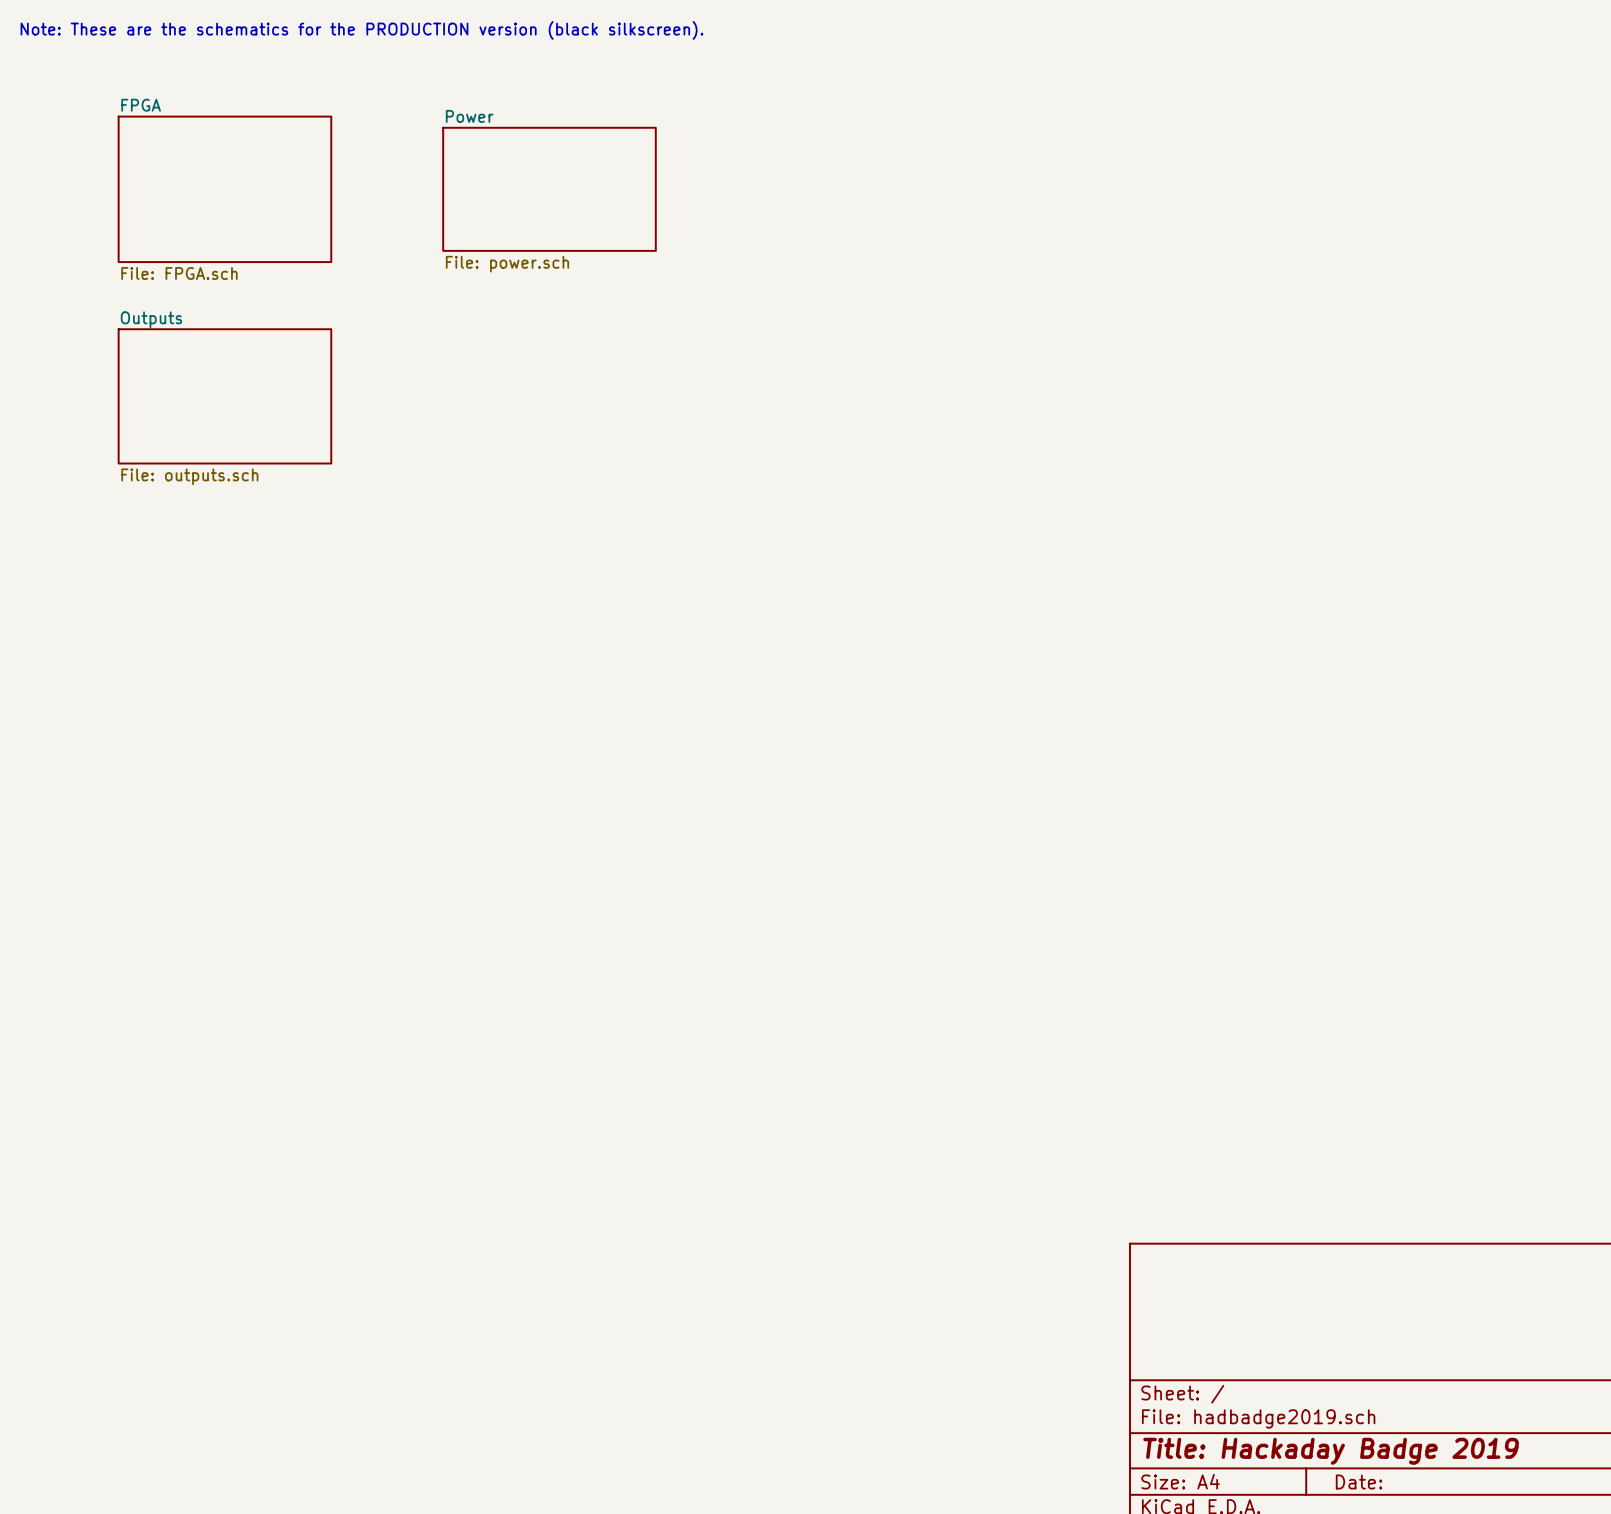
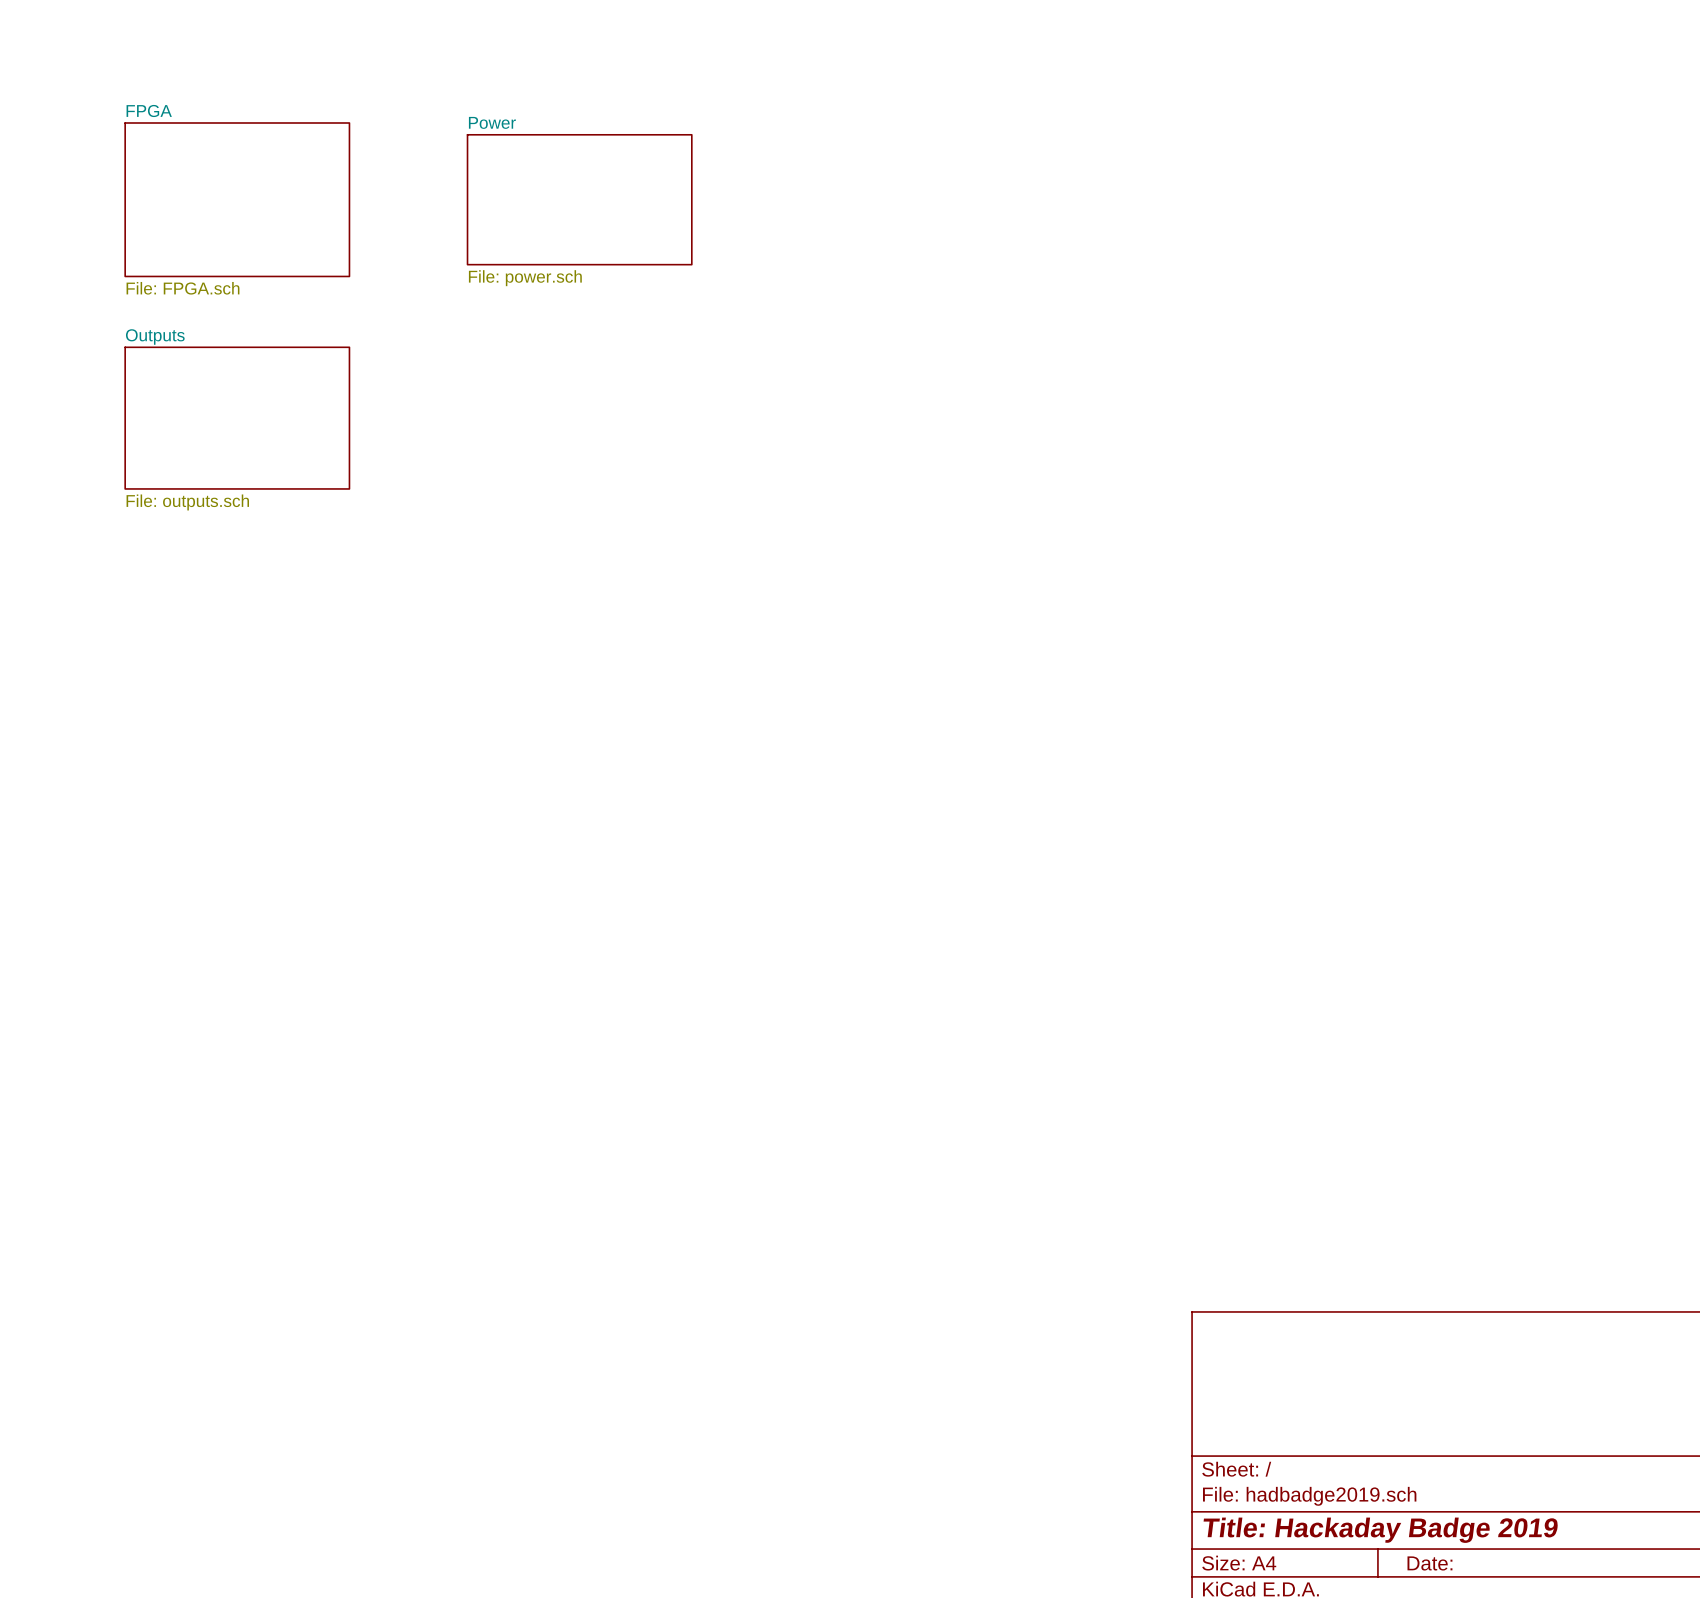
text: Note: These are the schematics for the PRODUCTION version (black silkscreen). (361, 30) -> none

